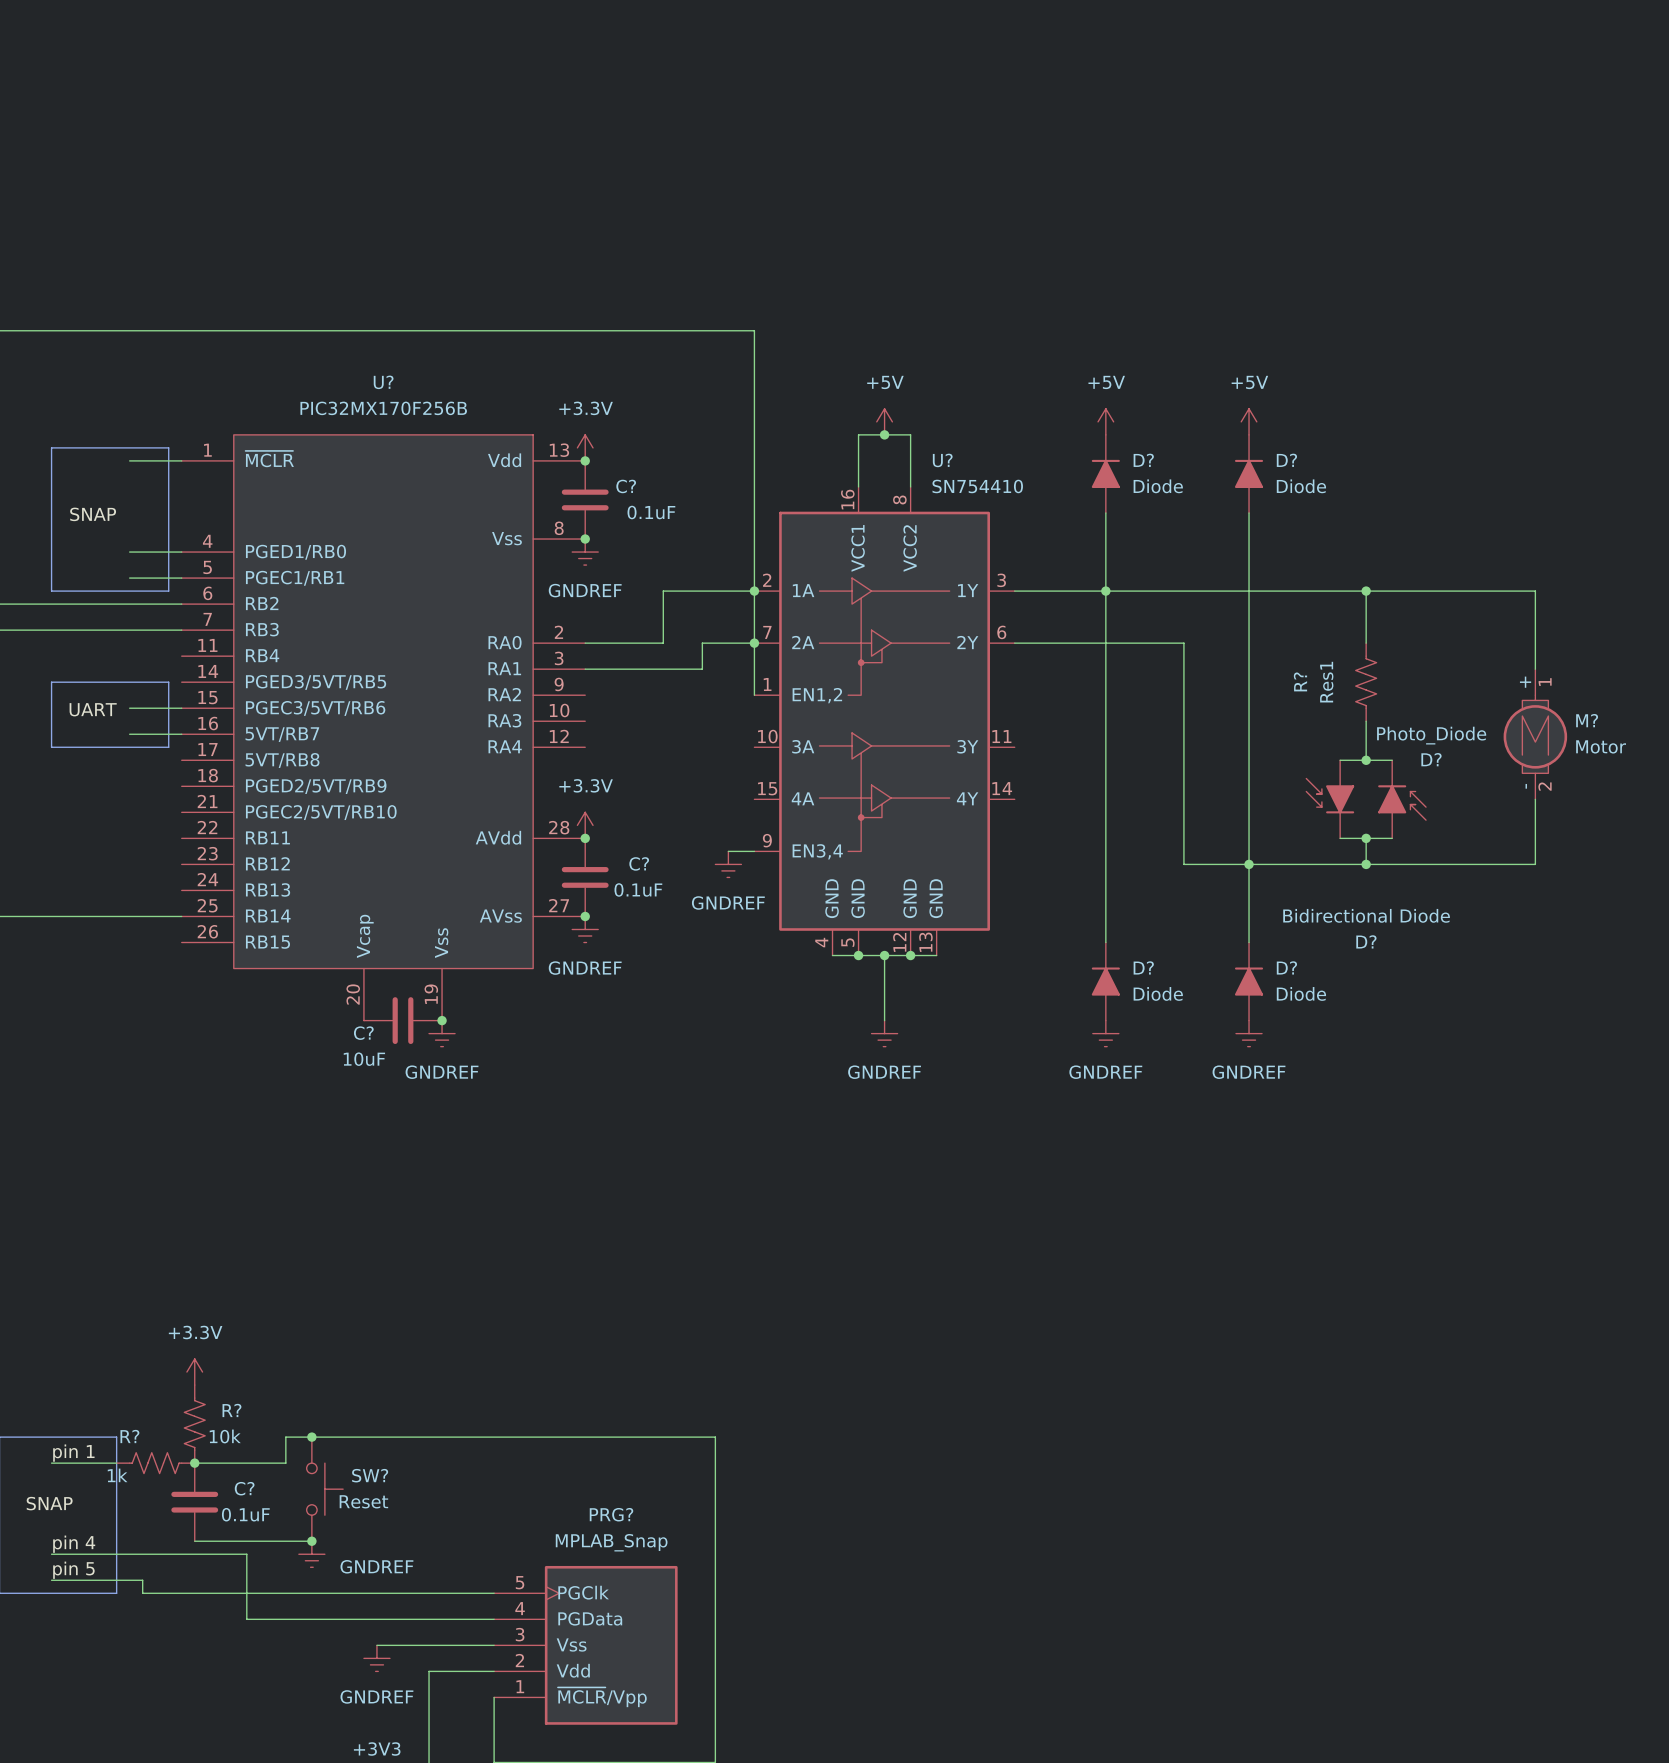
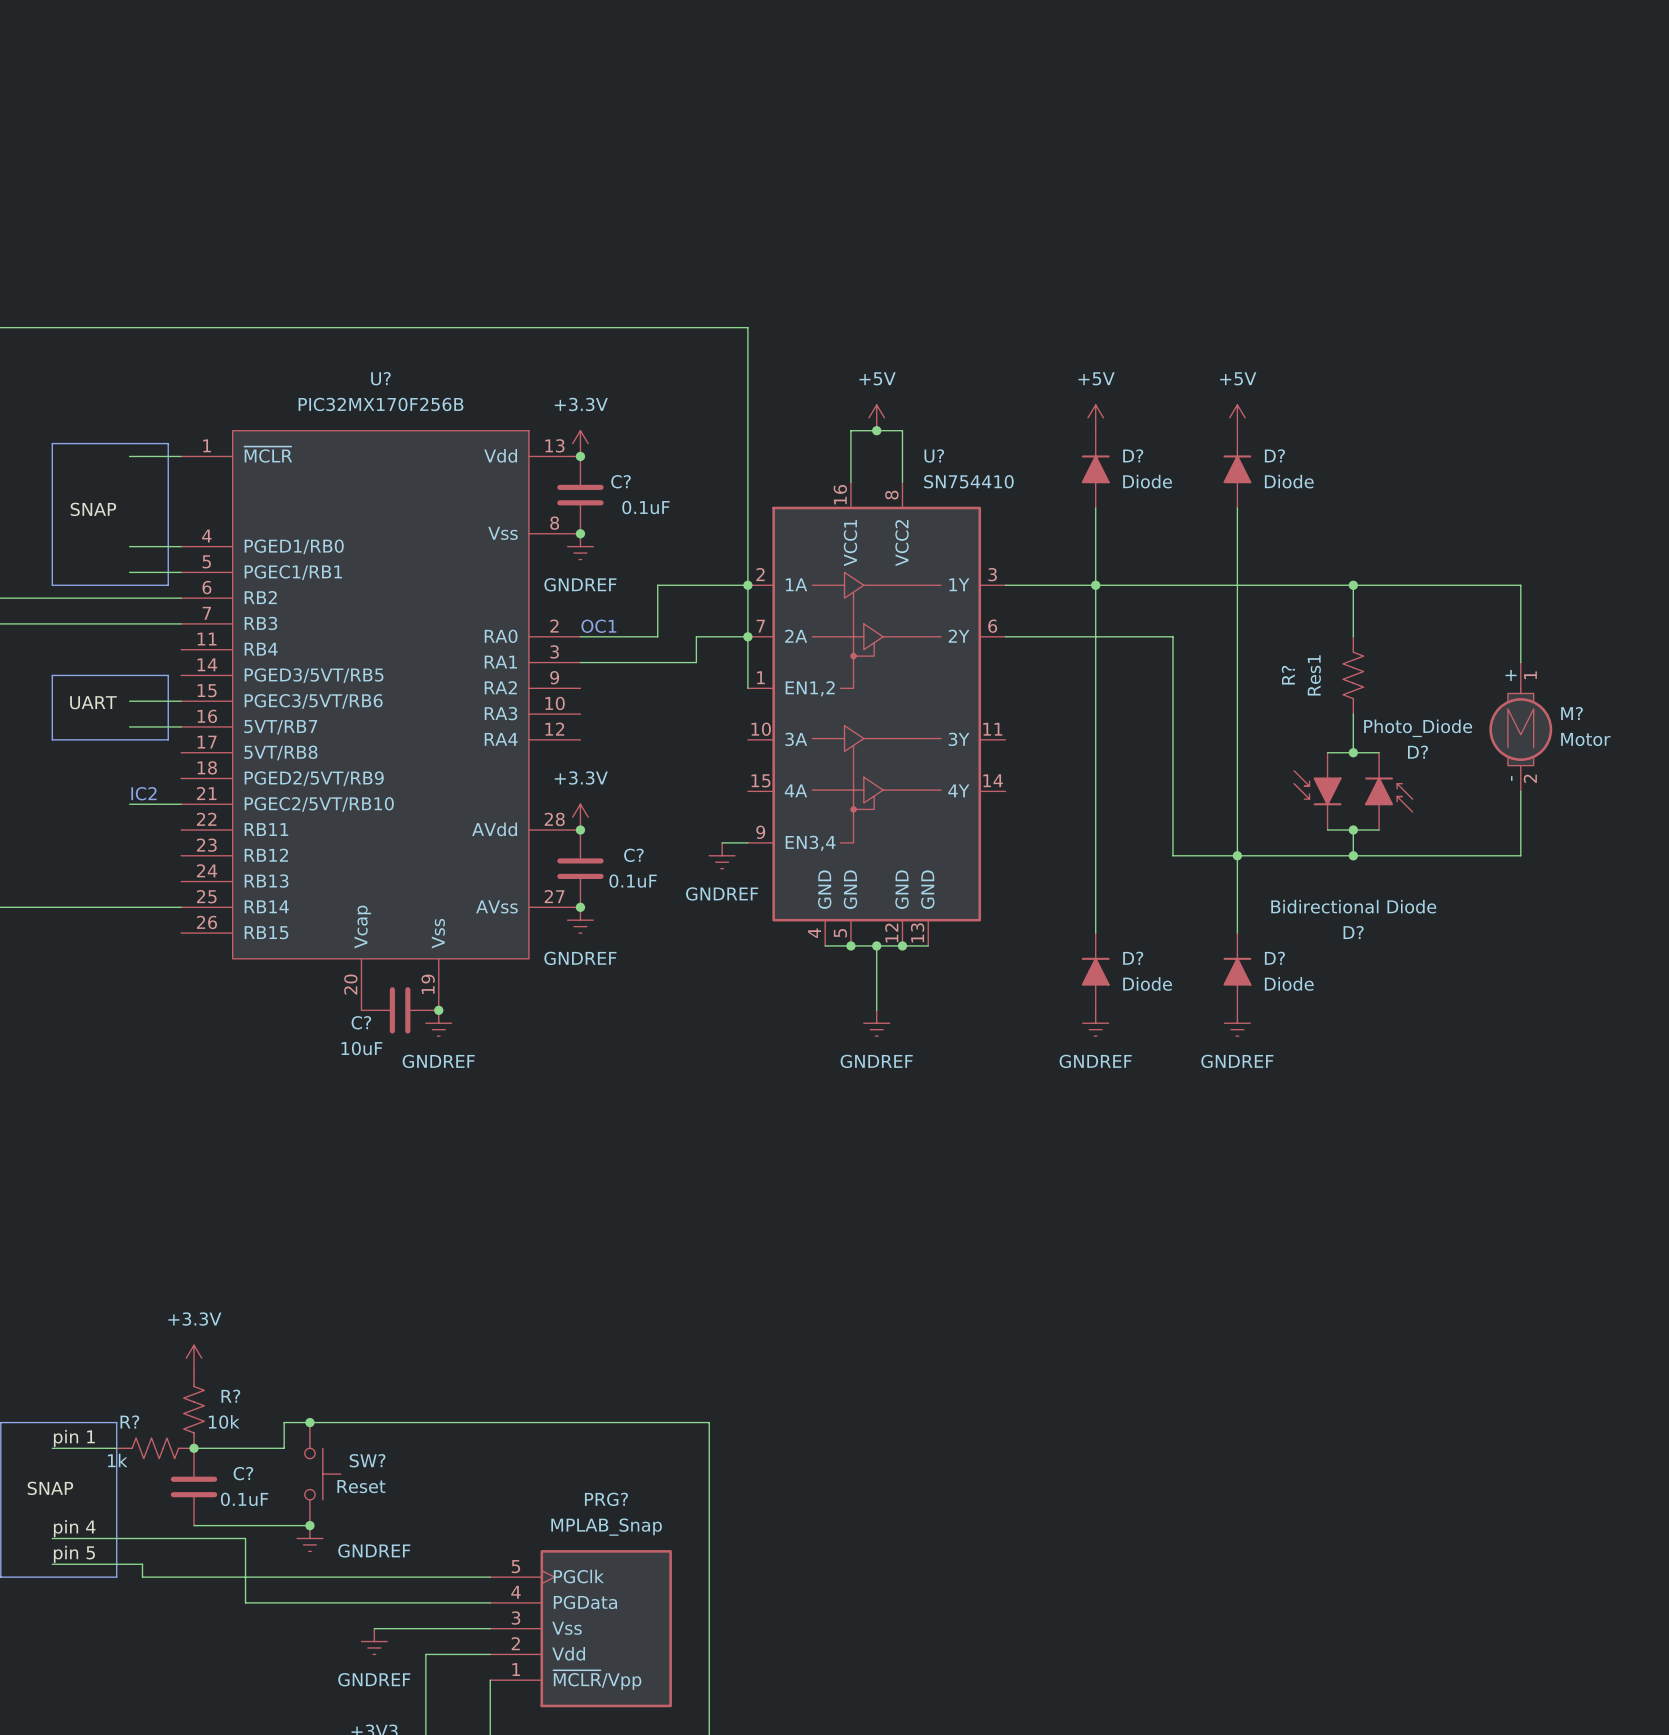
text: none -> OC1 (598, 626)
text: none -> IC2 (143, 793)
wire: none -> (129, 804) (181, 804)

